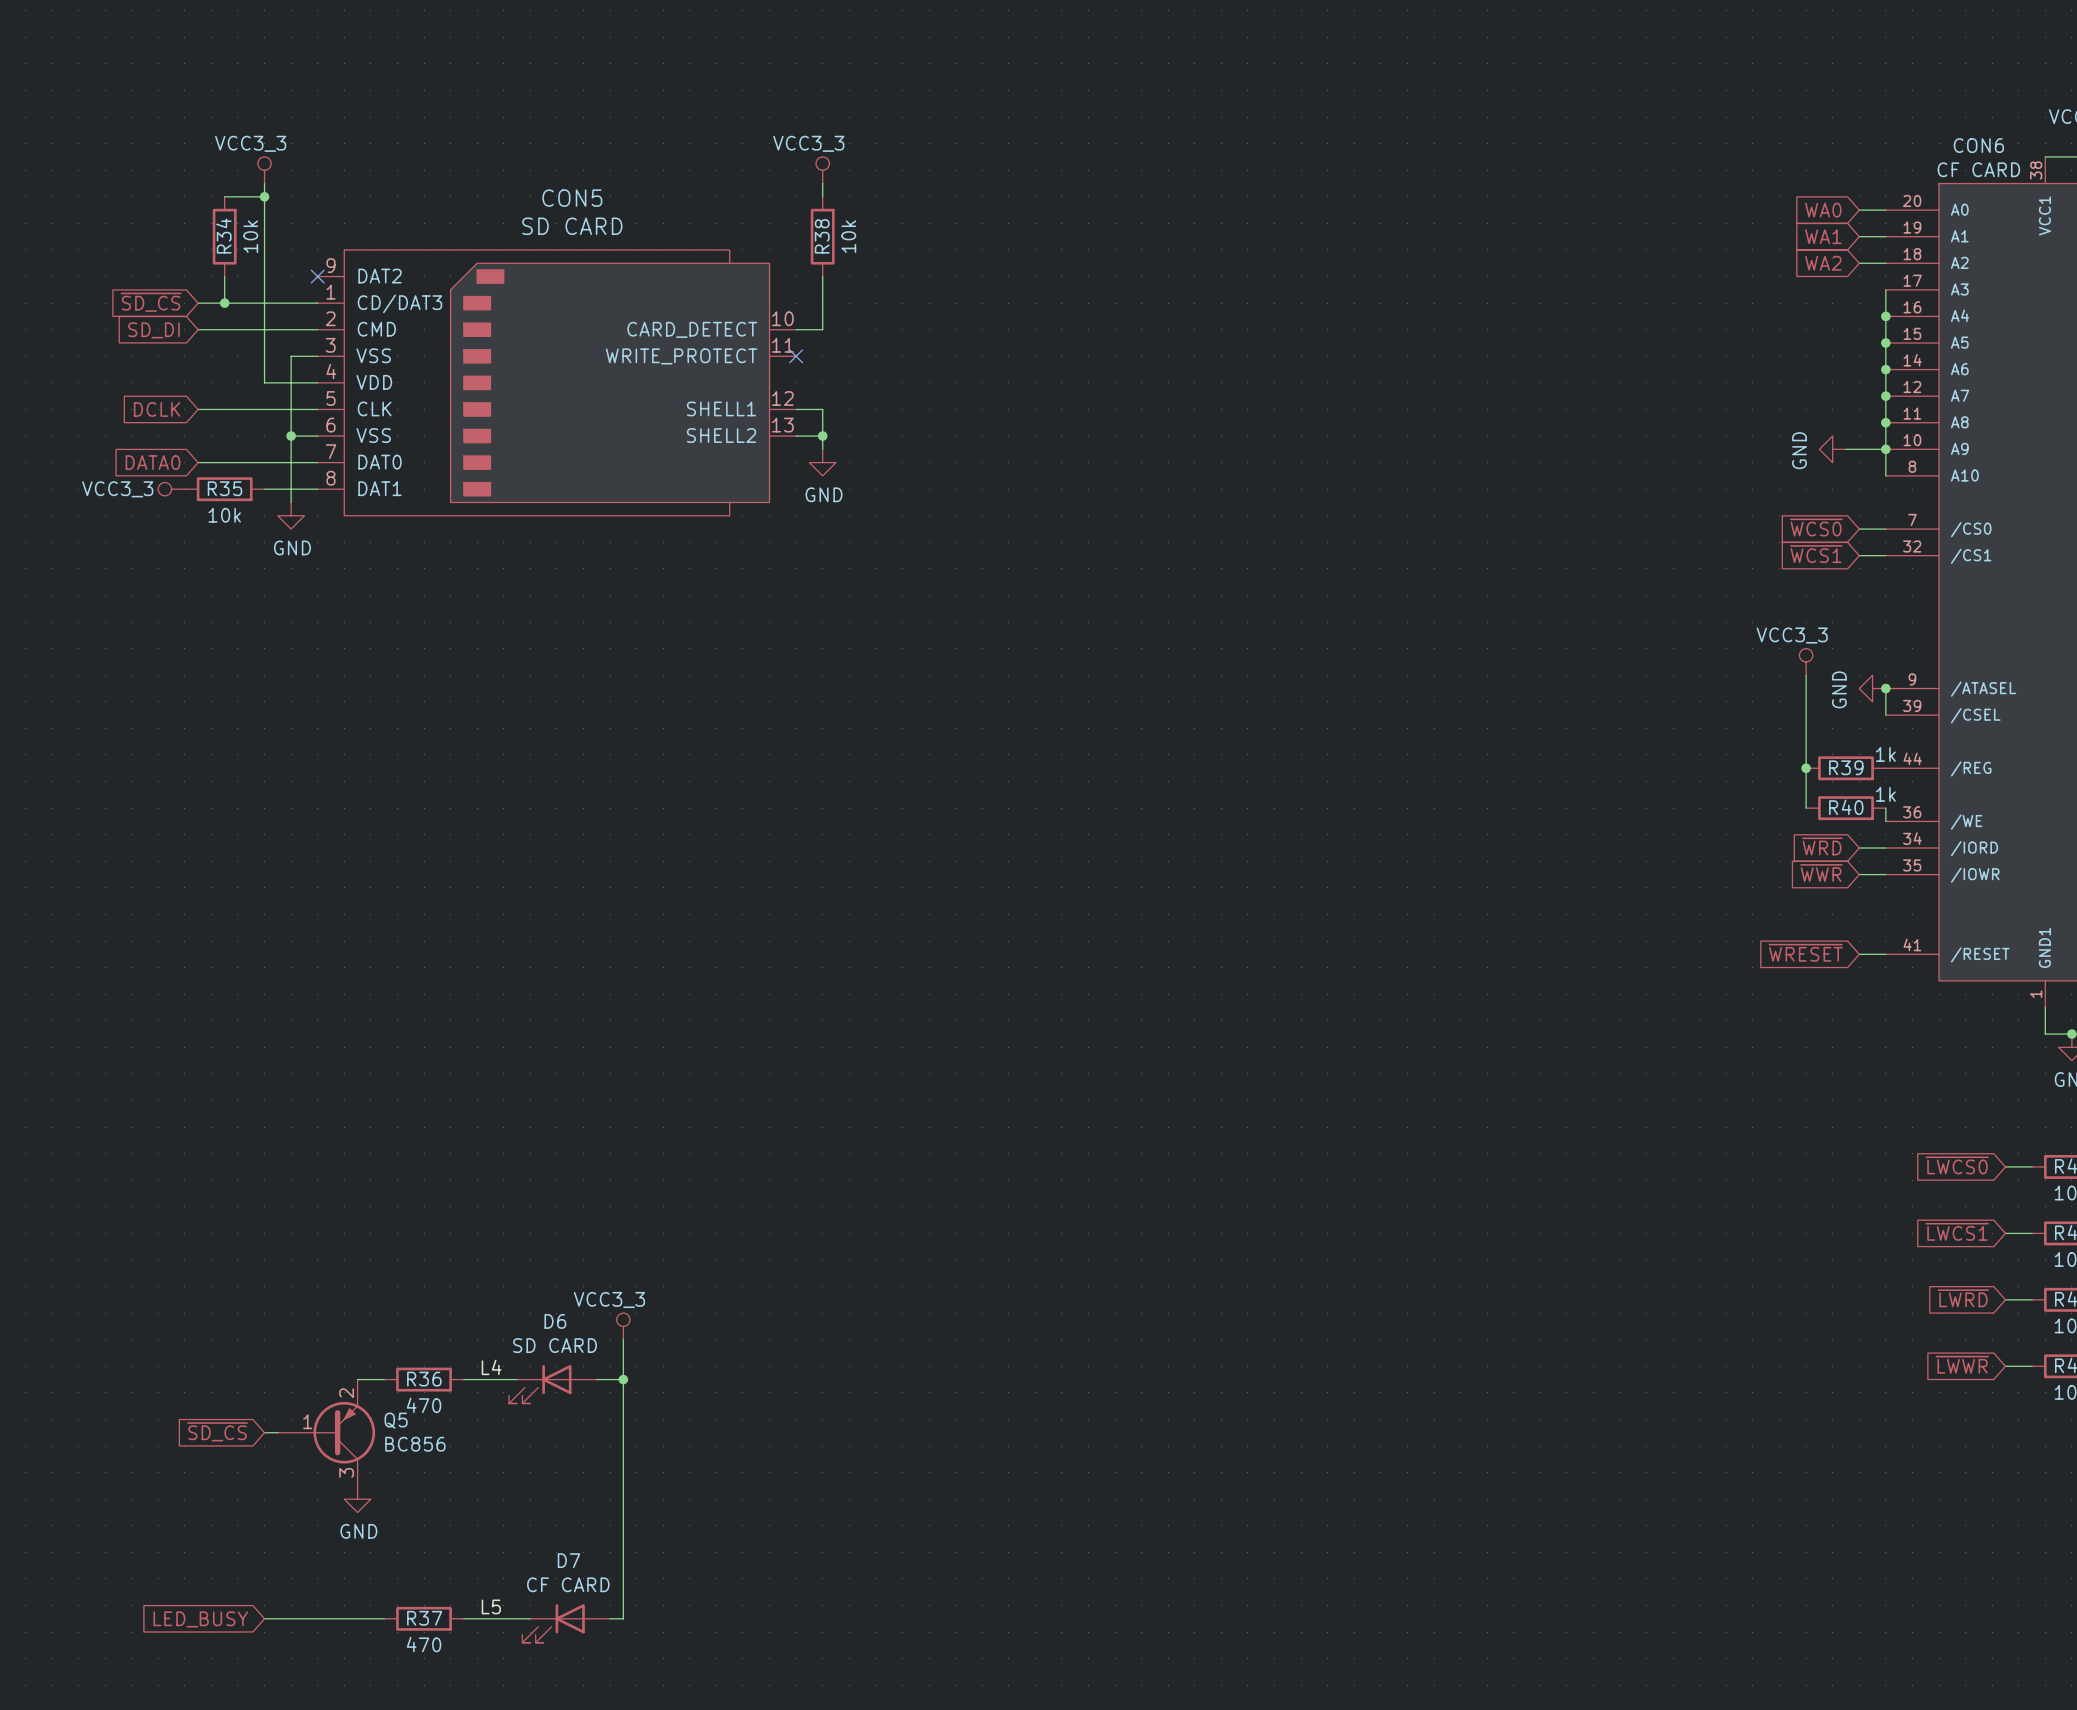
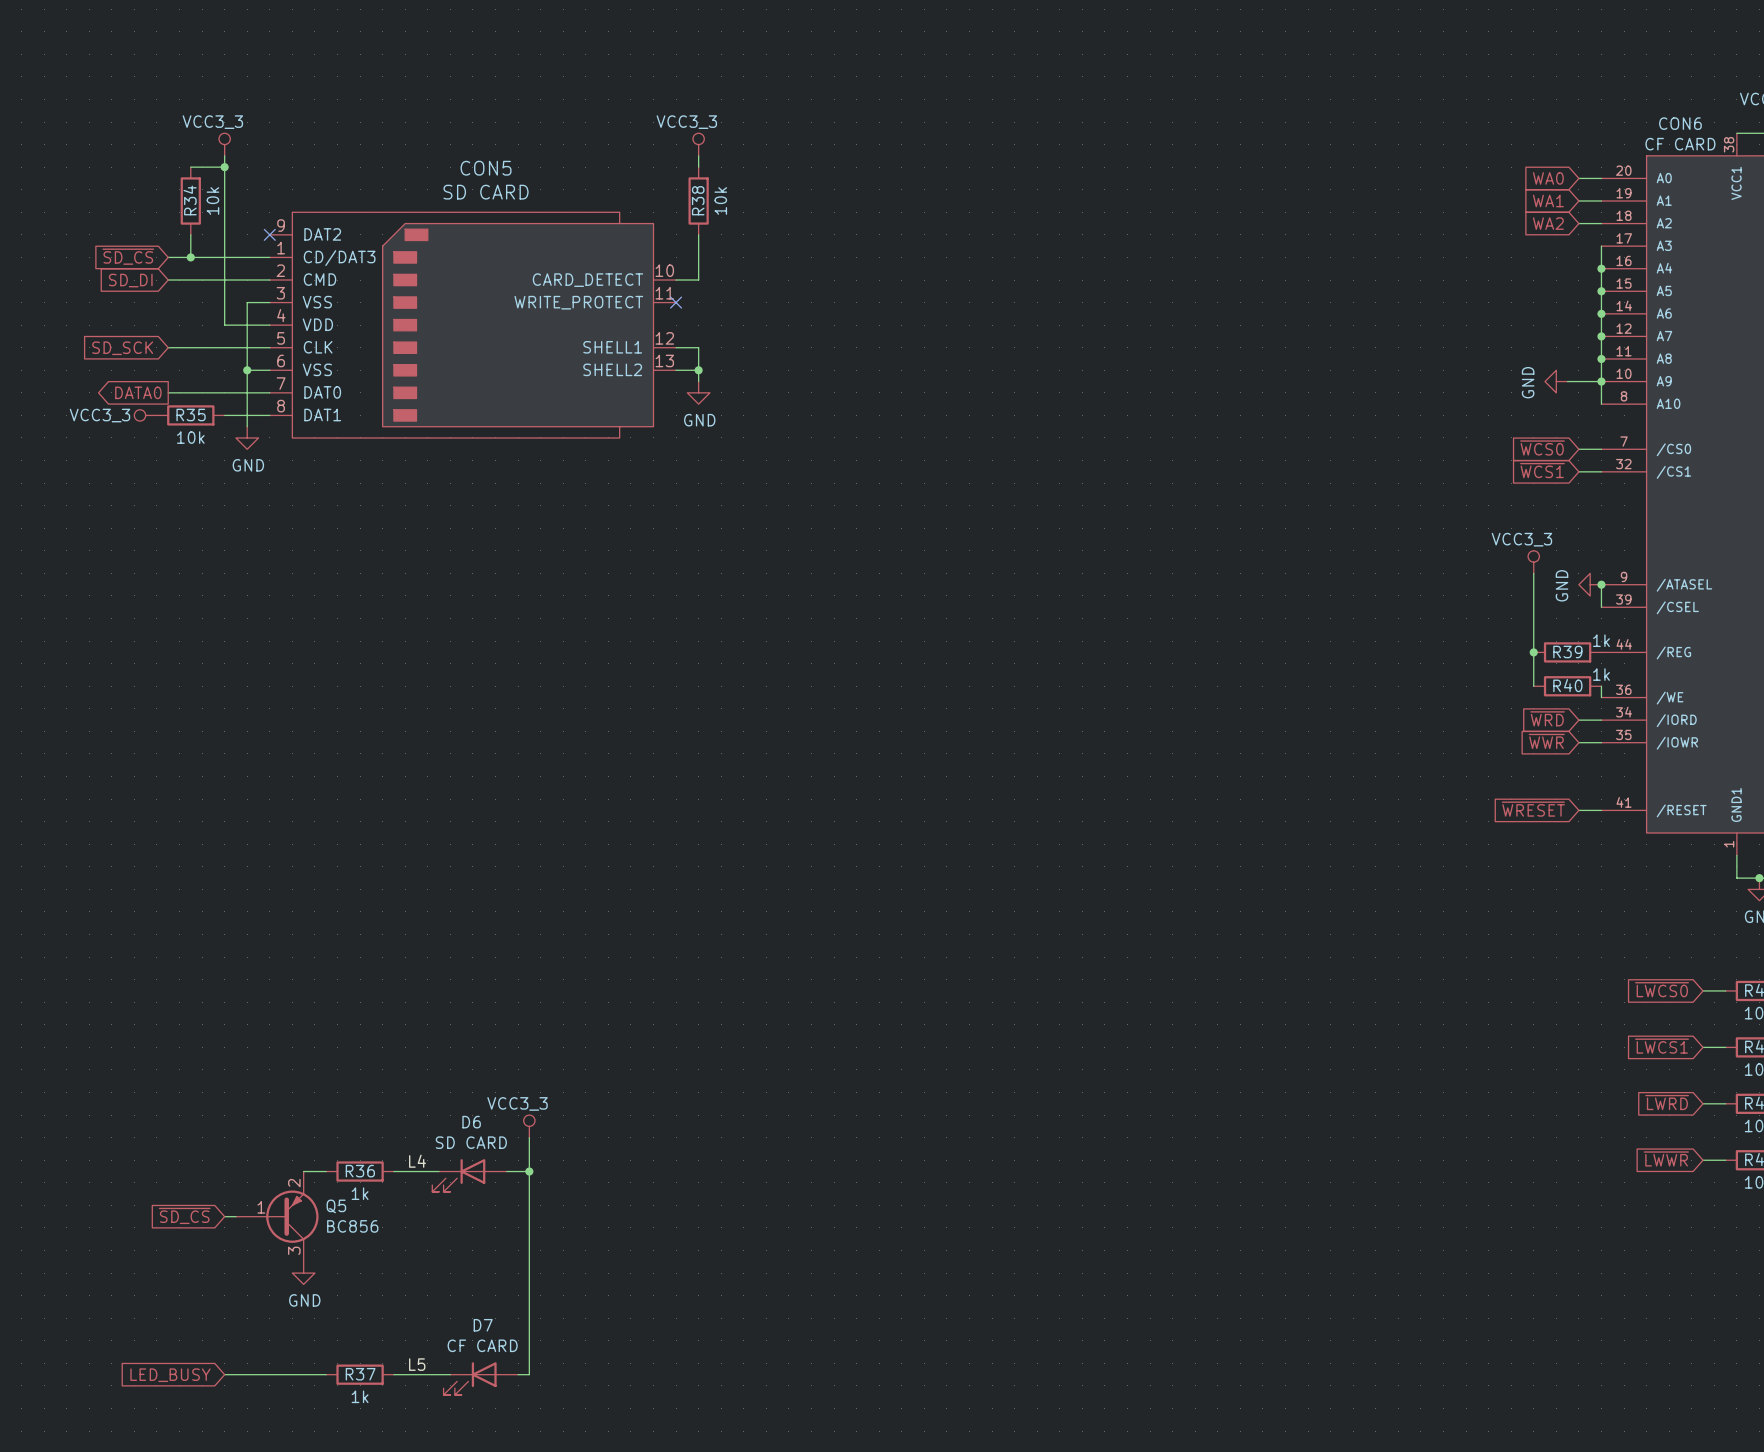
global label: DCLK (157, 409) -> SD_SCK (122, 348)
global label shape: input (152, 462) -> output (138, 392)
R36 value: 470 (424, 1405) -> 1k (360, 1193)
R37 value: 470 (424, 1644) -> 1k (360, 1396)

